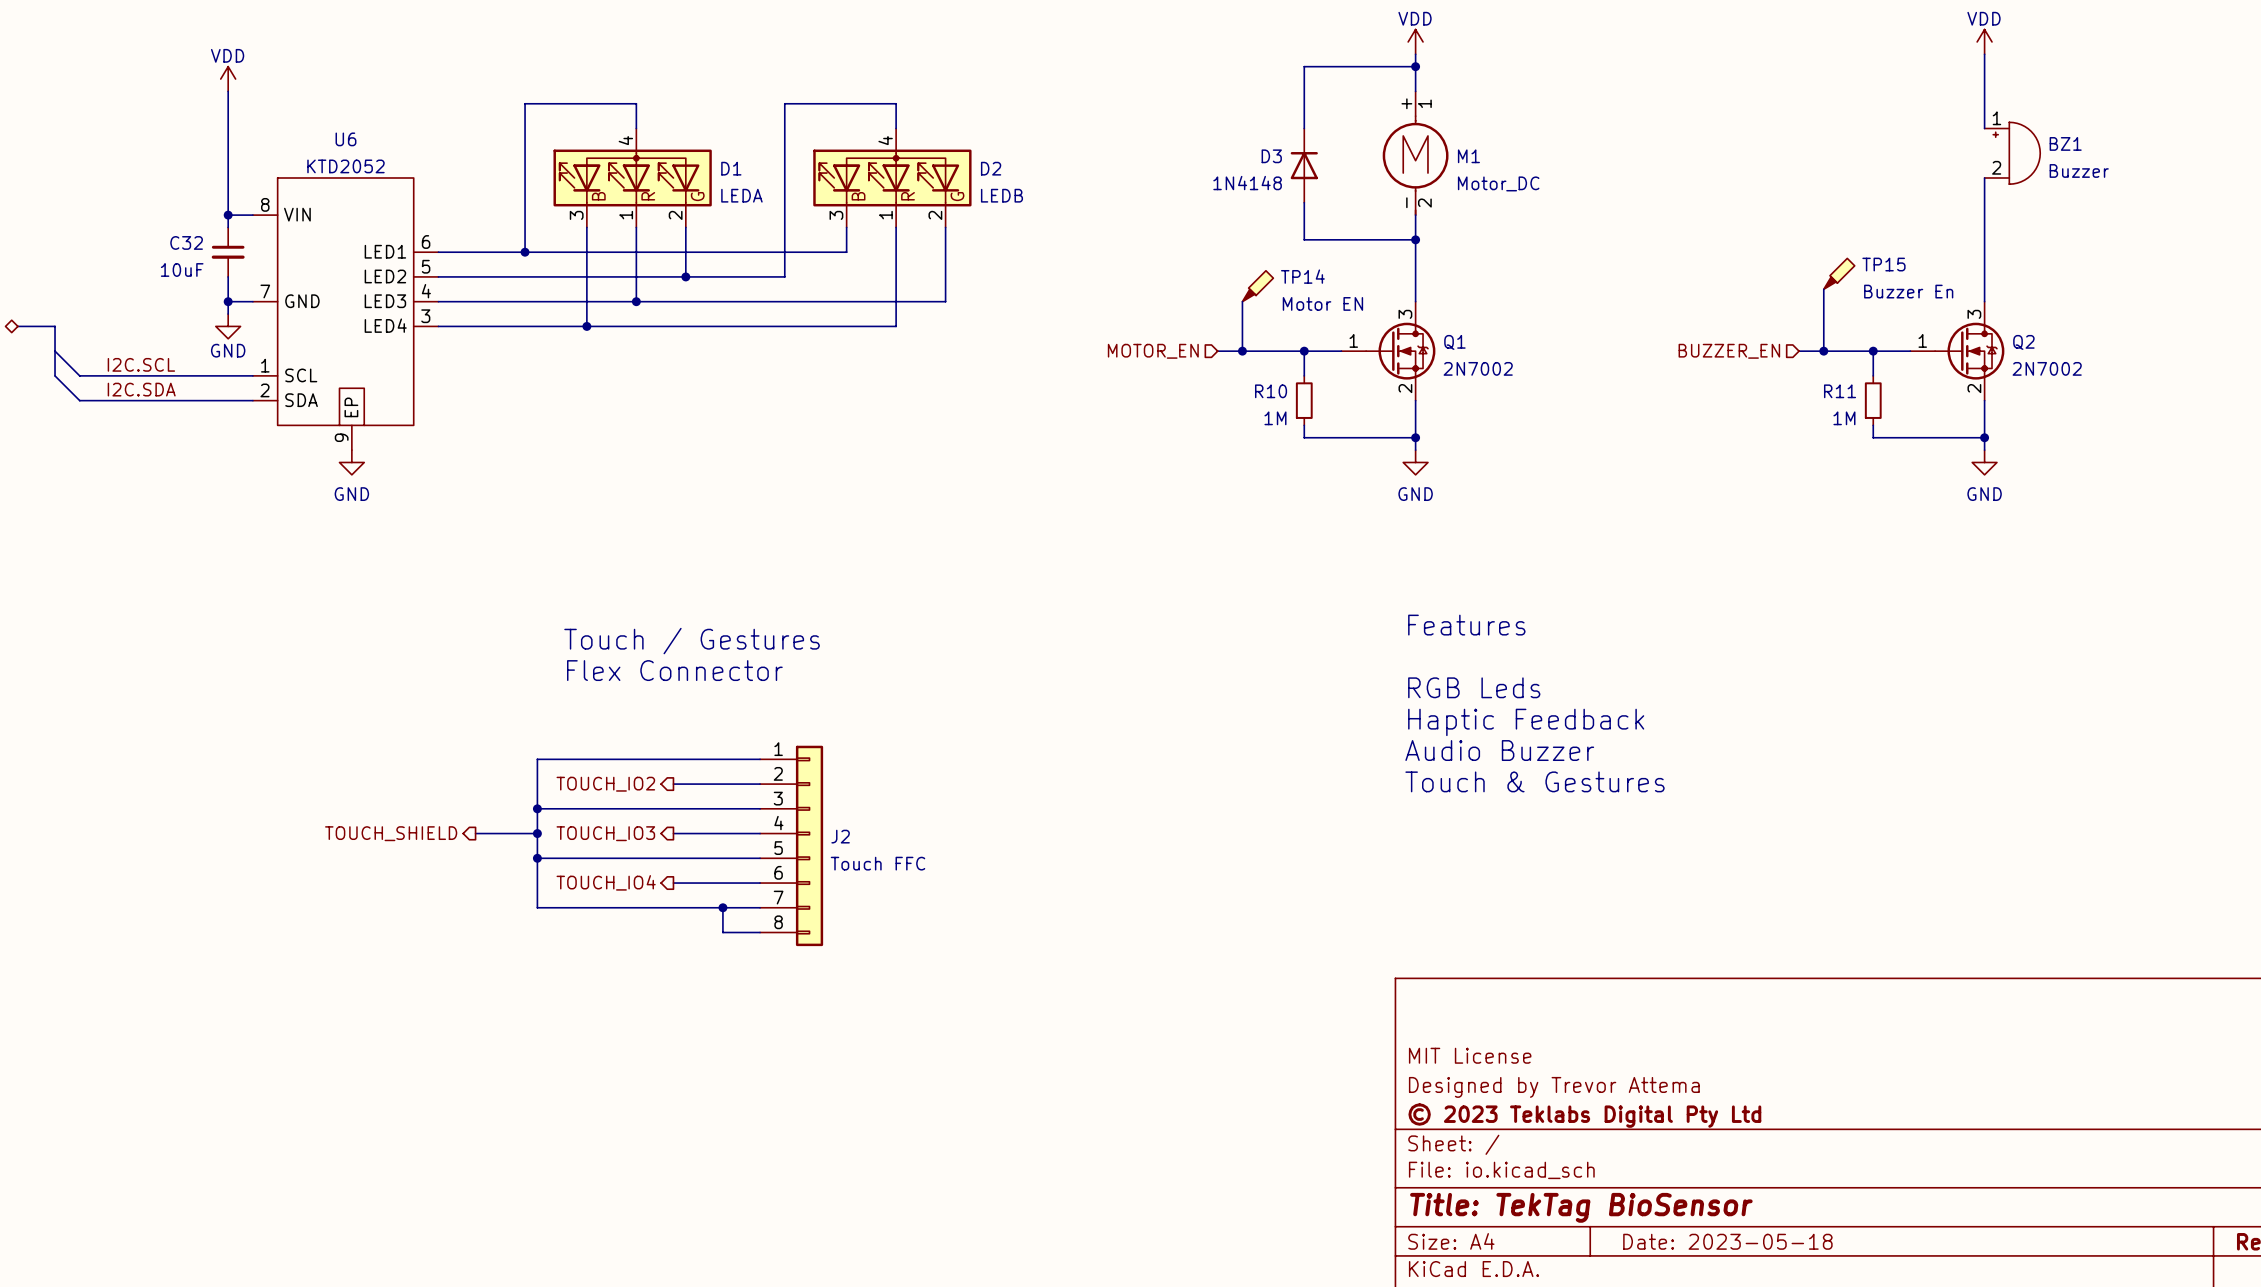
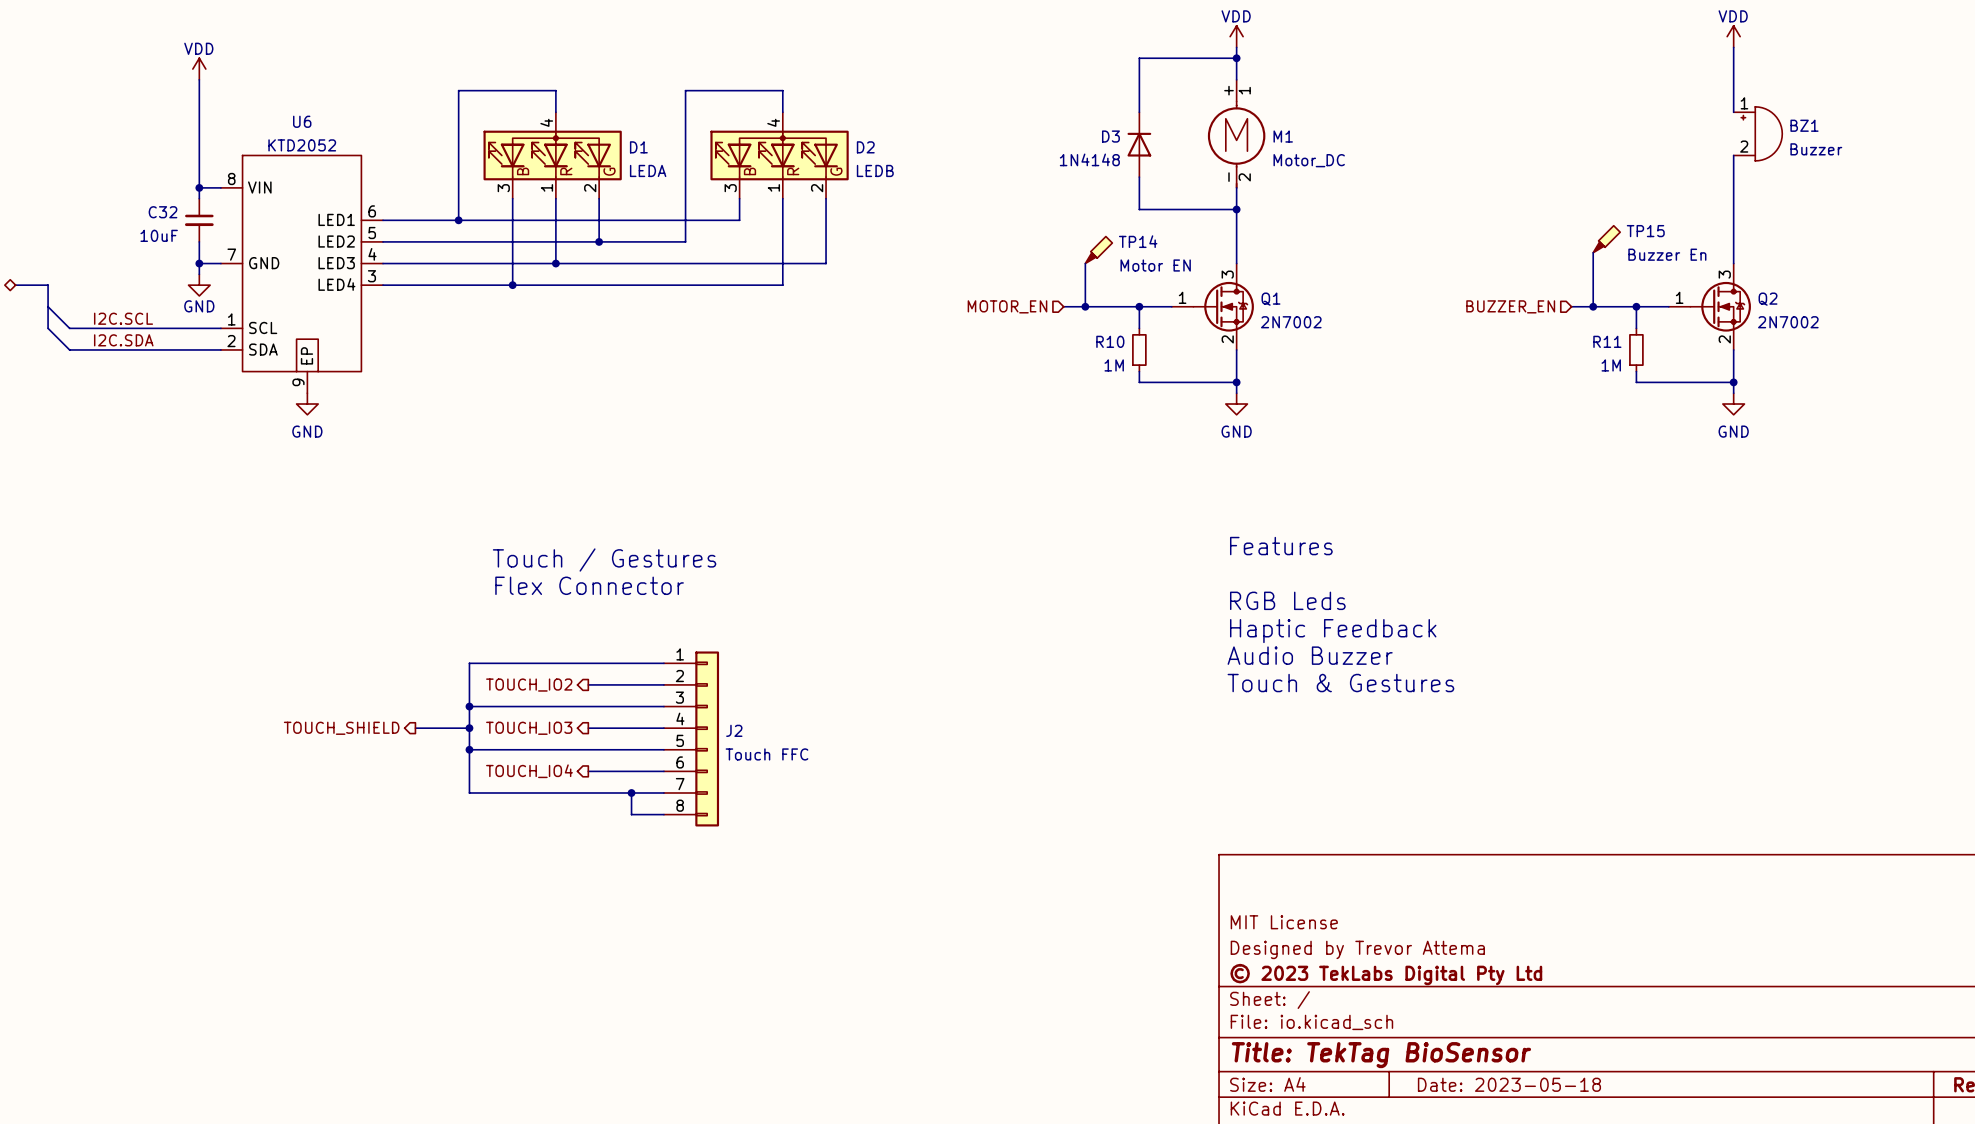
title block: © 2023 Teklabs Digital Pty Ltd (1584, 1115) -> © 2023 TekLabs Digital Pty Ltd (1386, 974)

